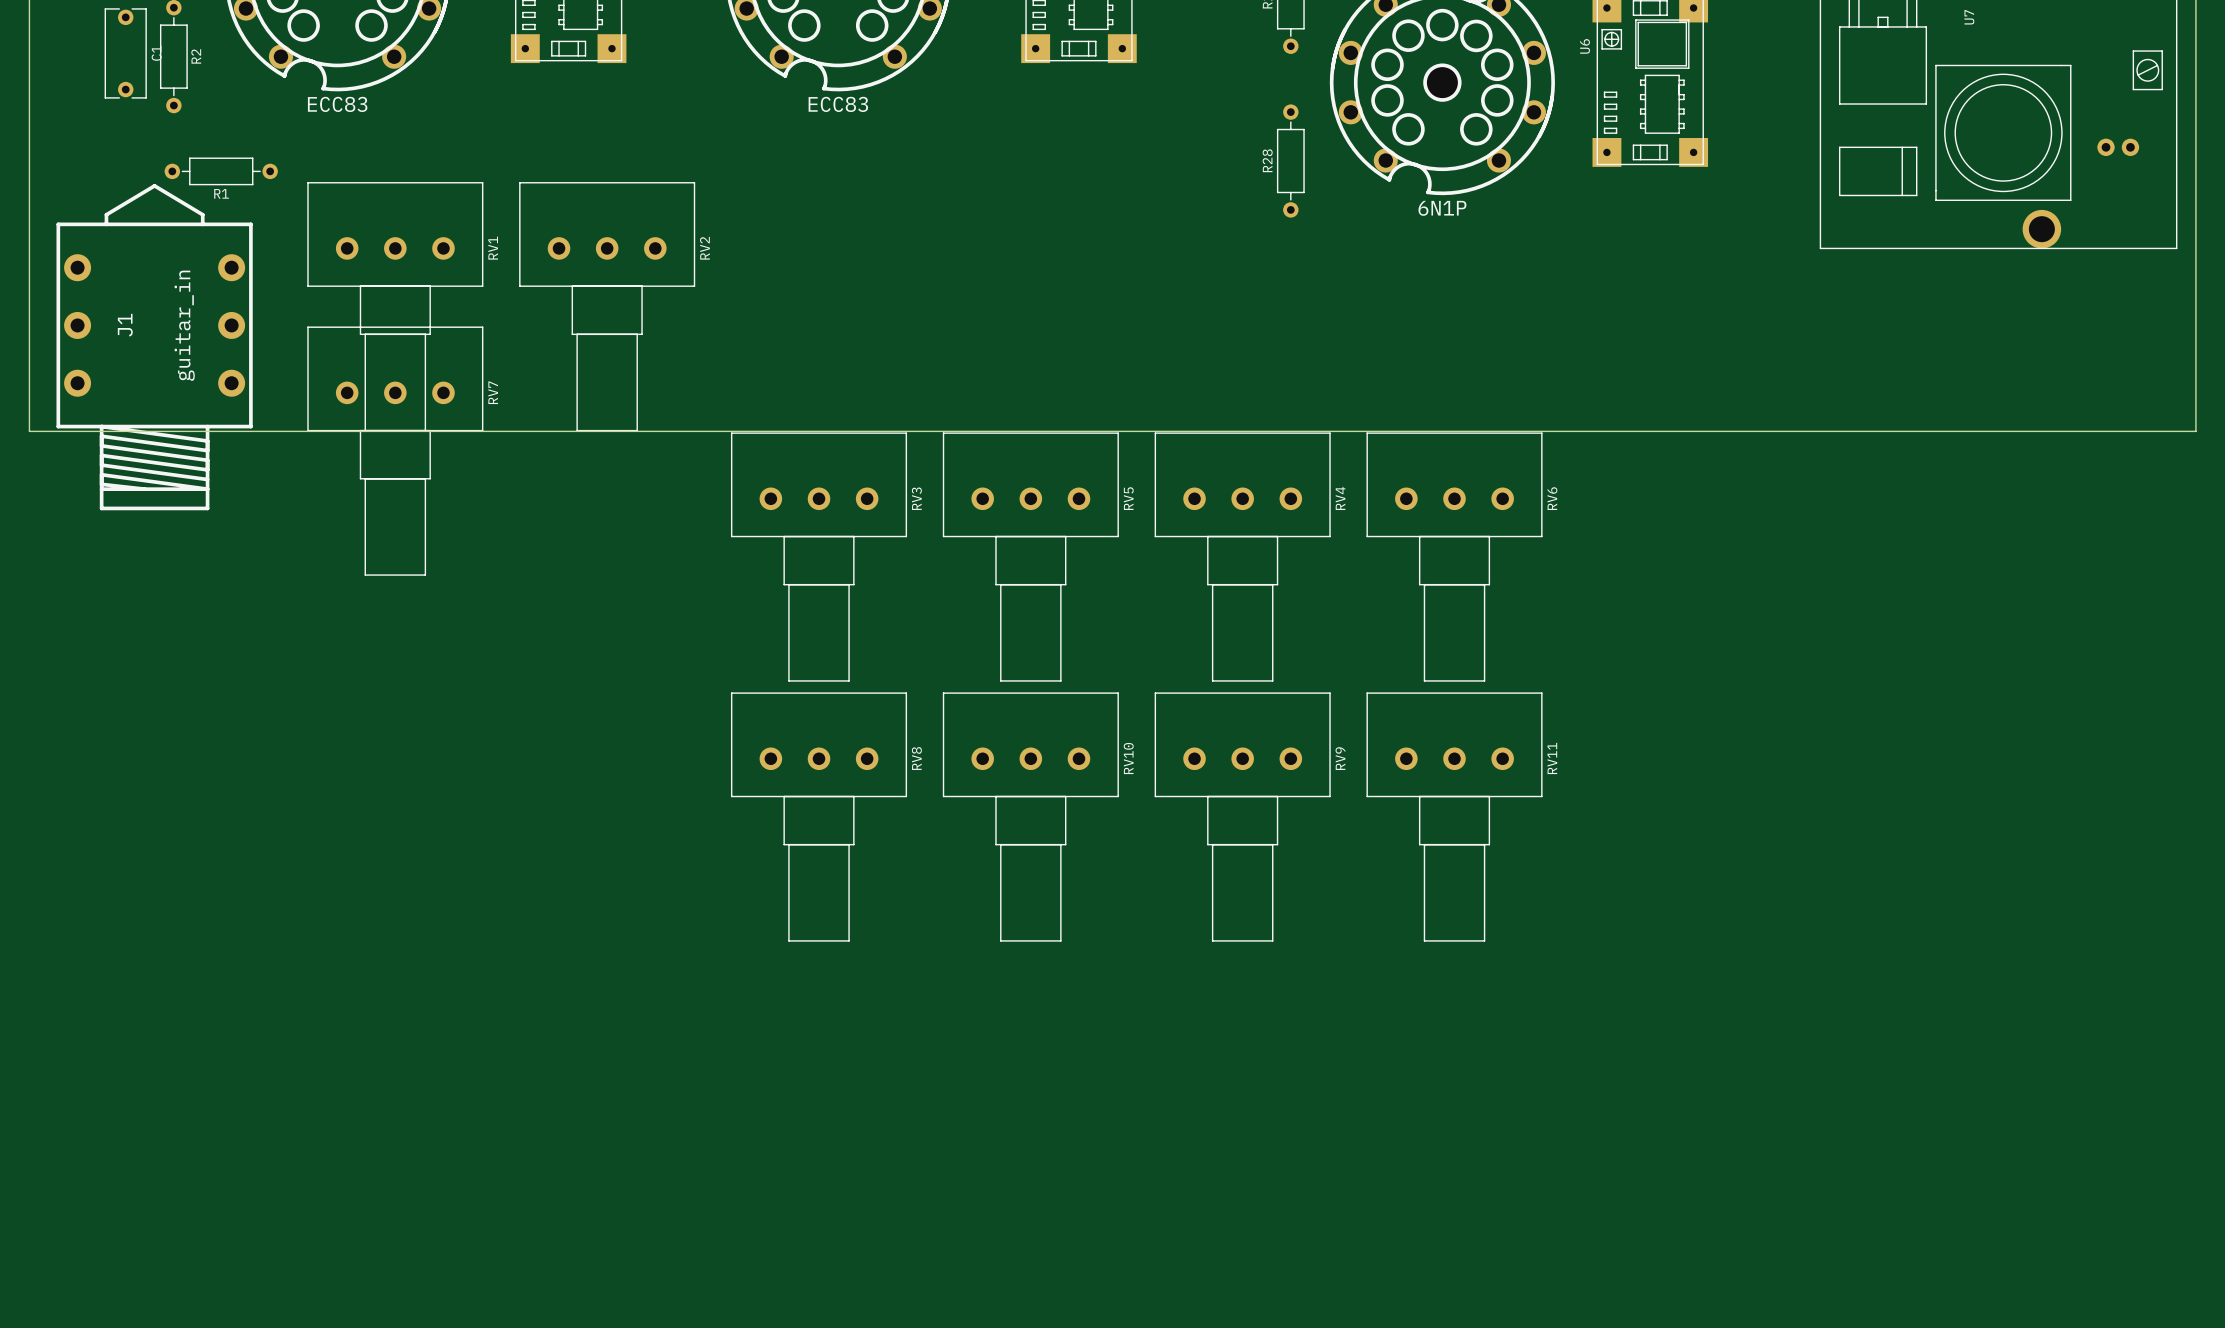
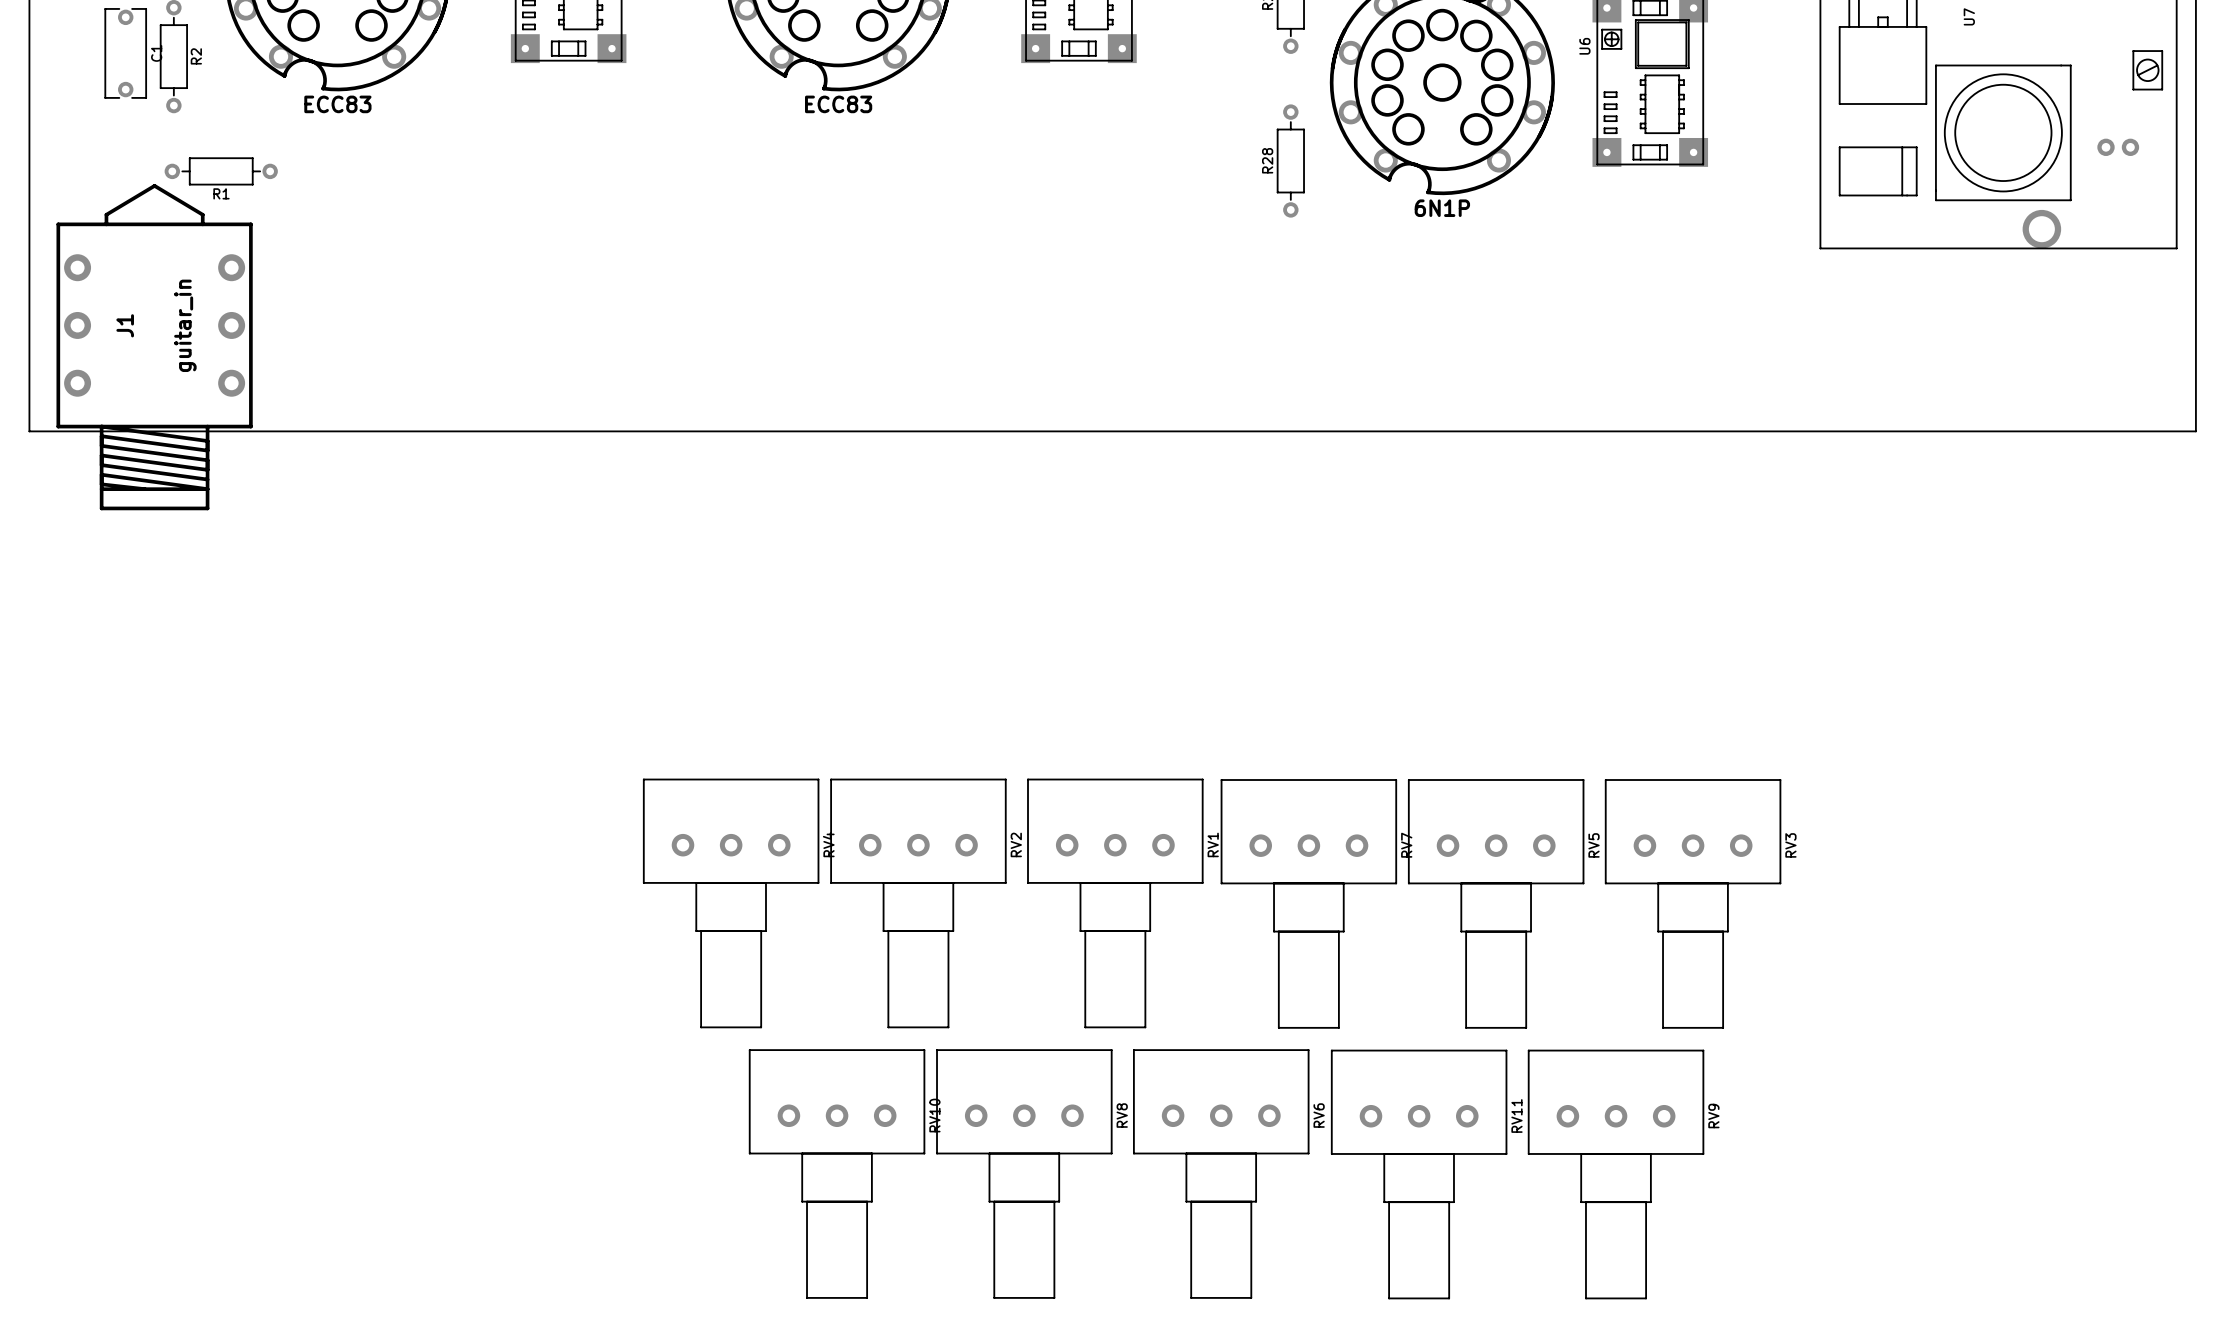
RV1 footprint: [307, 182, 484, 432] -> [1027, 778, 1204, 1028]
RV2 footprint: [519, 182, 696, 432] -> [830, 778, 1007, 1028]
RV7 footprint: [307, 326, 484, 576] -> [1220, 779, 1397, 1029]
RV3 footprint: [731, 432, 907, 682] -> [1605, 779, 1781, 1029]
RV5 footprint: [942, 432, 1119, 682] -> [1408, 779, 1585, 1029]
RV6 footprint: [1366, 432, 1543, 682] -> [1133, 1049, 1310, 1299]
RV4 position: (1242, 557) -> (731, 903)
RV8 footprint: [731, 692, 907, 942] -> [936, 1049, 1113, 1299]
RV9 footprint: [1154, 692, 1331, 942] -> [1528, 1049, 1704, 1300]
RV11 footprint: [1366, 692, 1543, 942] -> [1331, 1049, 1508, 1300]
RV10 position: (1030, 817) -> (837, 1174)

